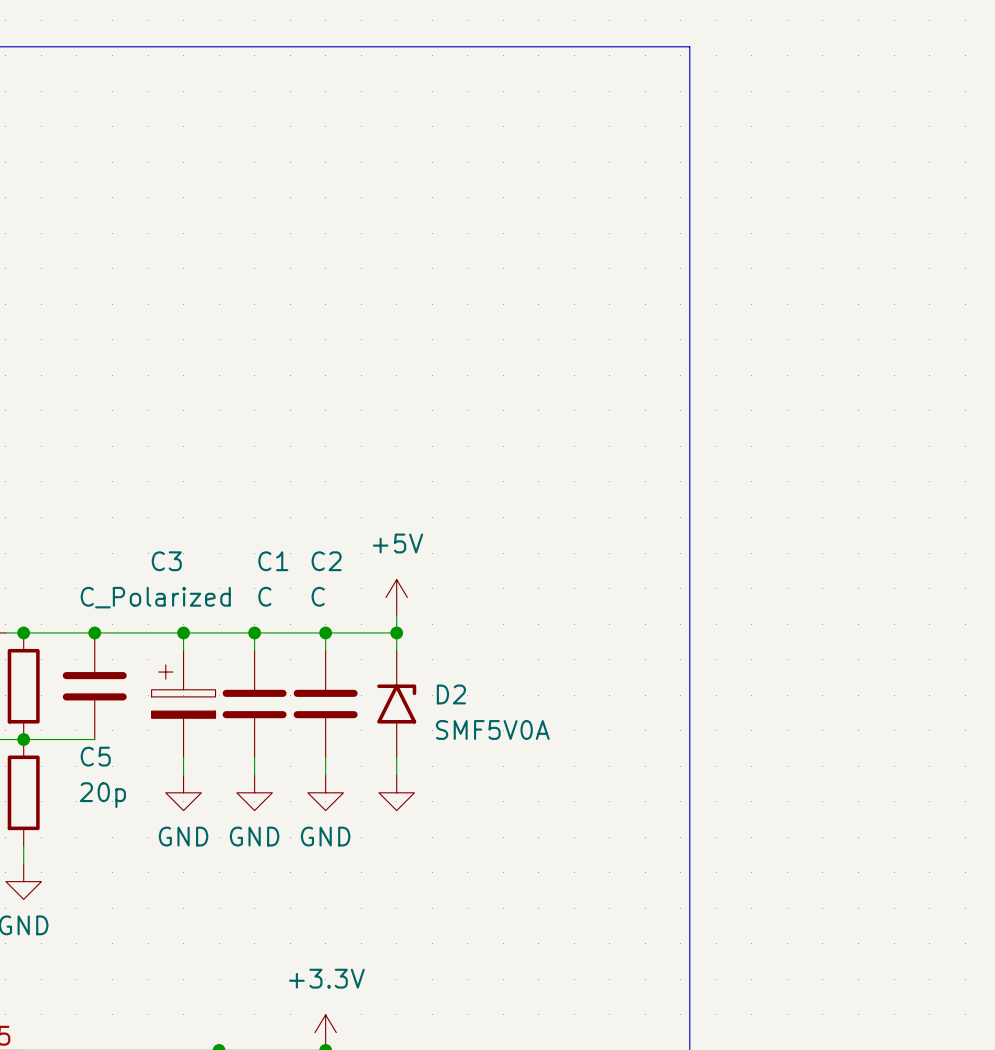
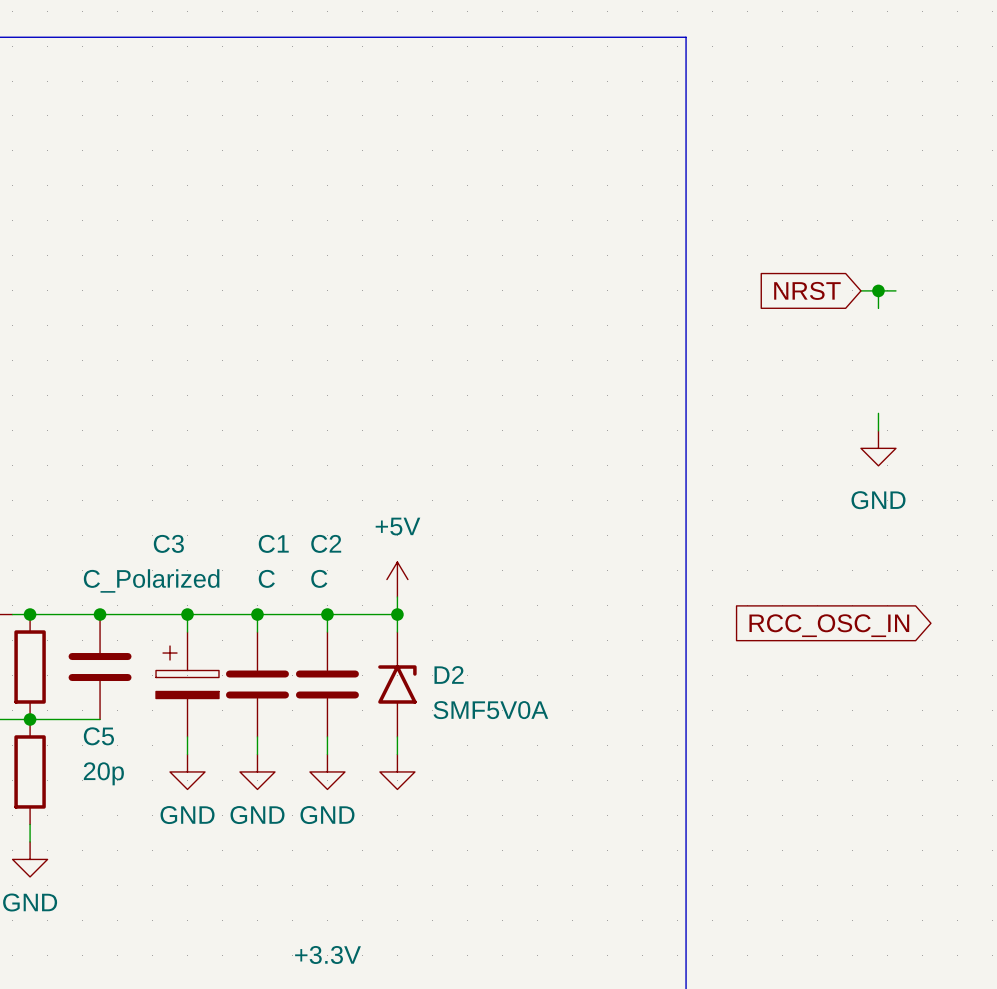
global label: none -> NRST (807, 290)
wire: none -> (860, 290) (895, 290)
wire: none -> (878, 290) (878, 308)
junction: none -> (878, 290)
wire: none -> (878, 413) (878, 430)
power symbol: none -> GND (878, 448)
global label: none -> RCC_OSC_IN (829, 625)

